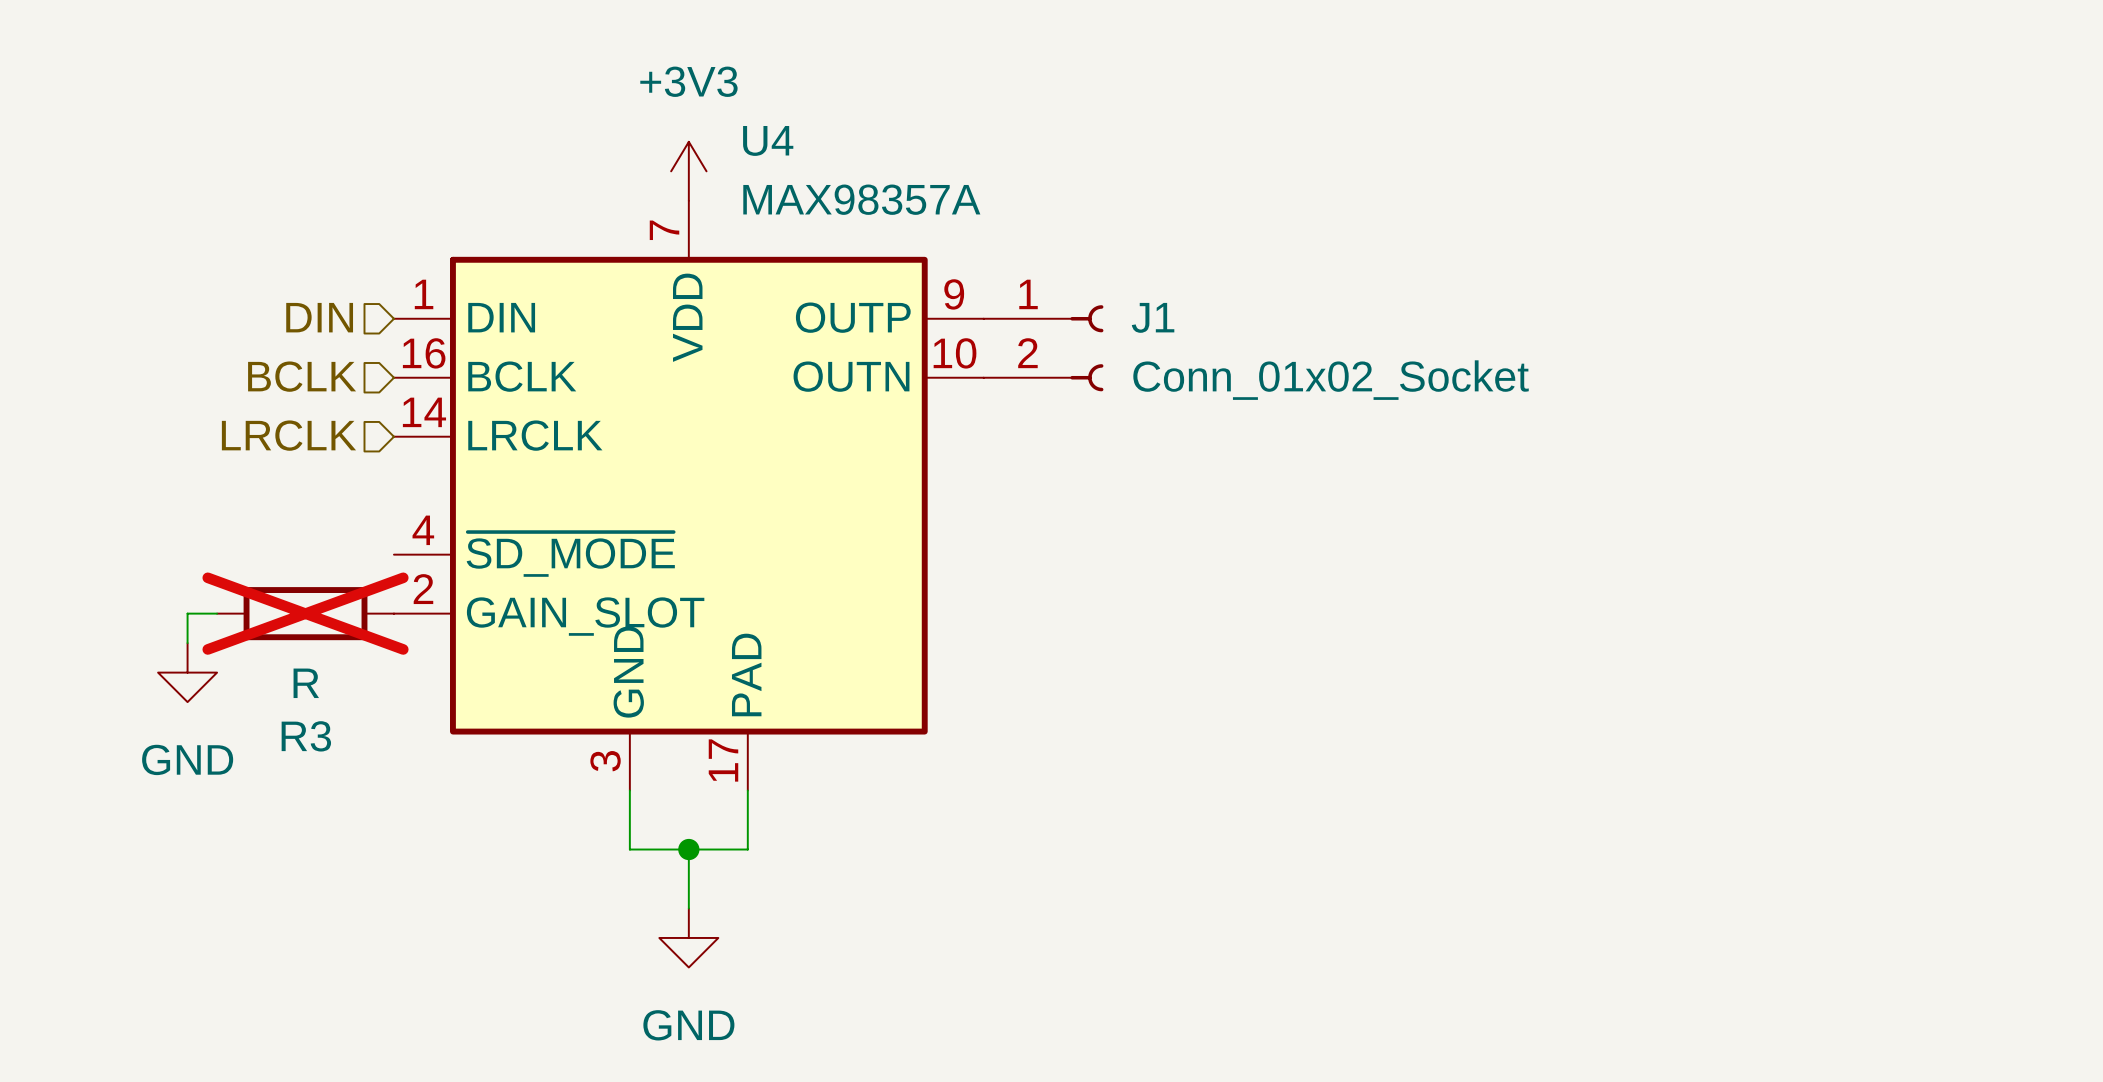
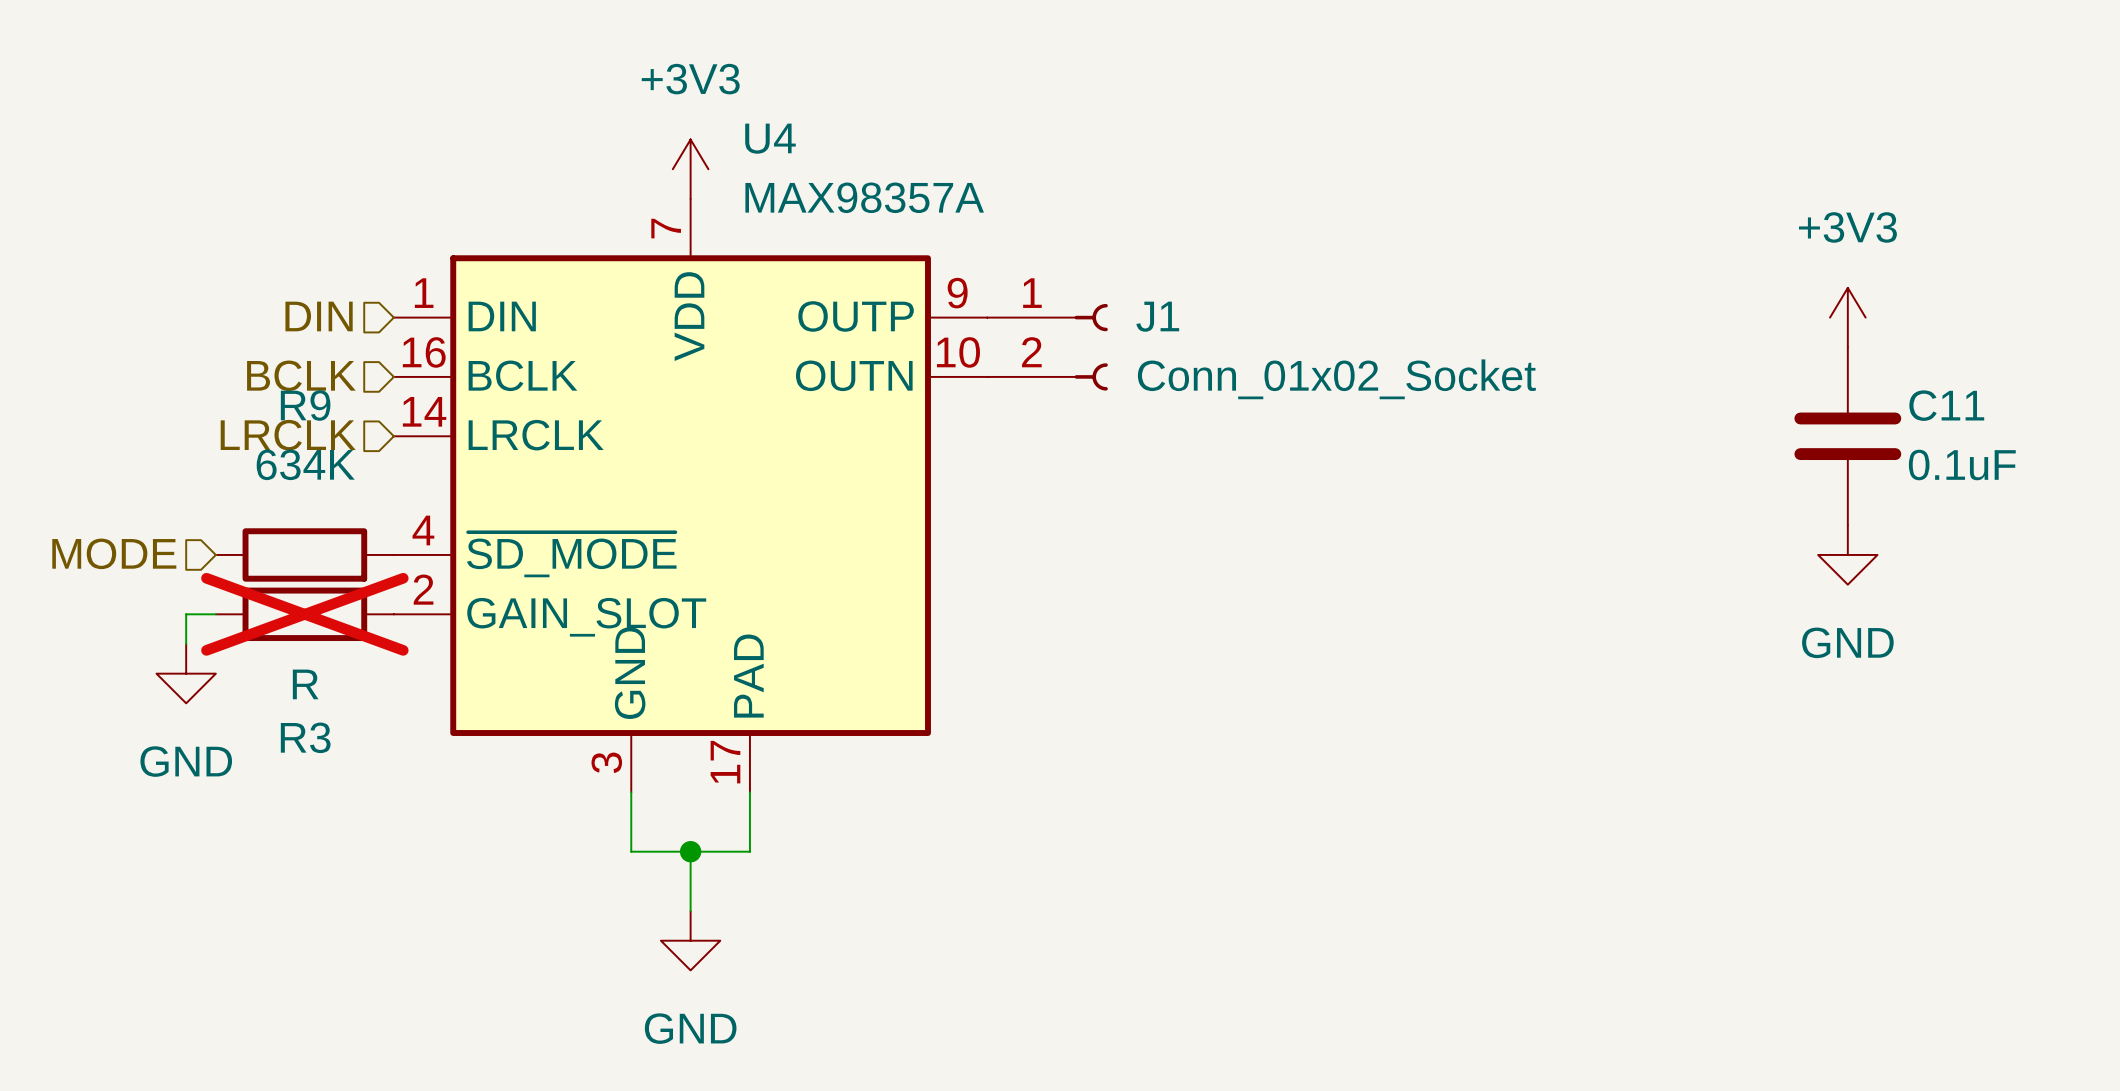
power symbol: none -> +3V3 (1847, 317)
C11: none -> 0.1uF (1847, 436)
hierarchical label: none -> MODE (114, 553)
R9: none -> 634K (304, 554)
power symbol: none -> GND (1847, 554)

